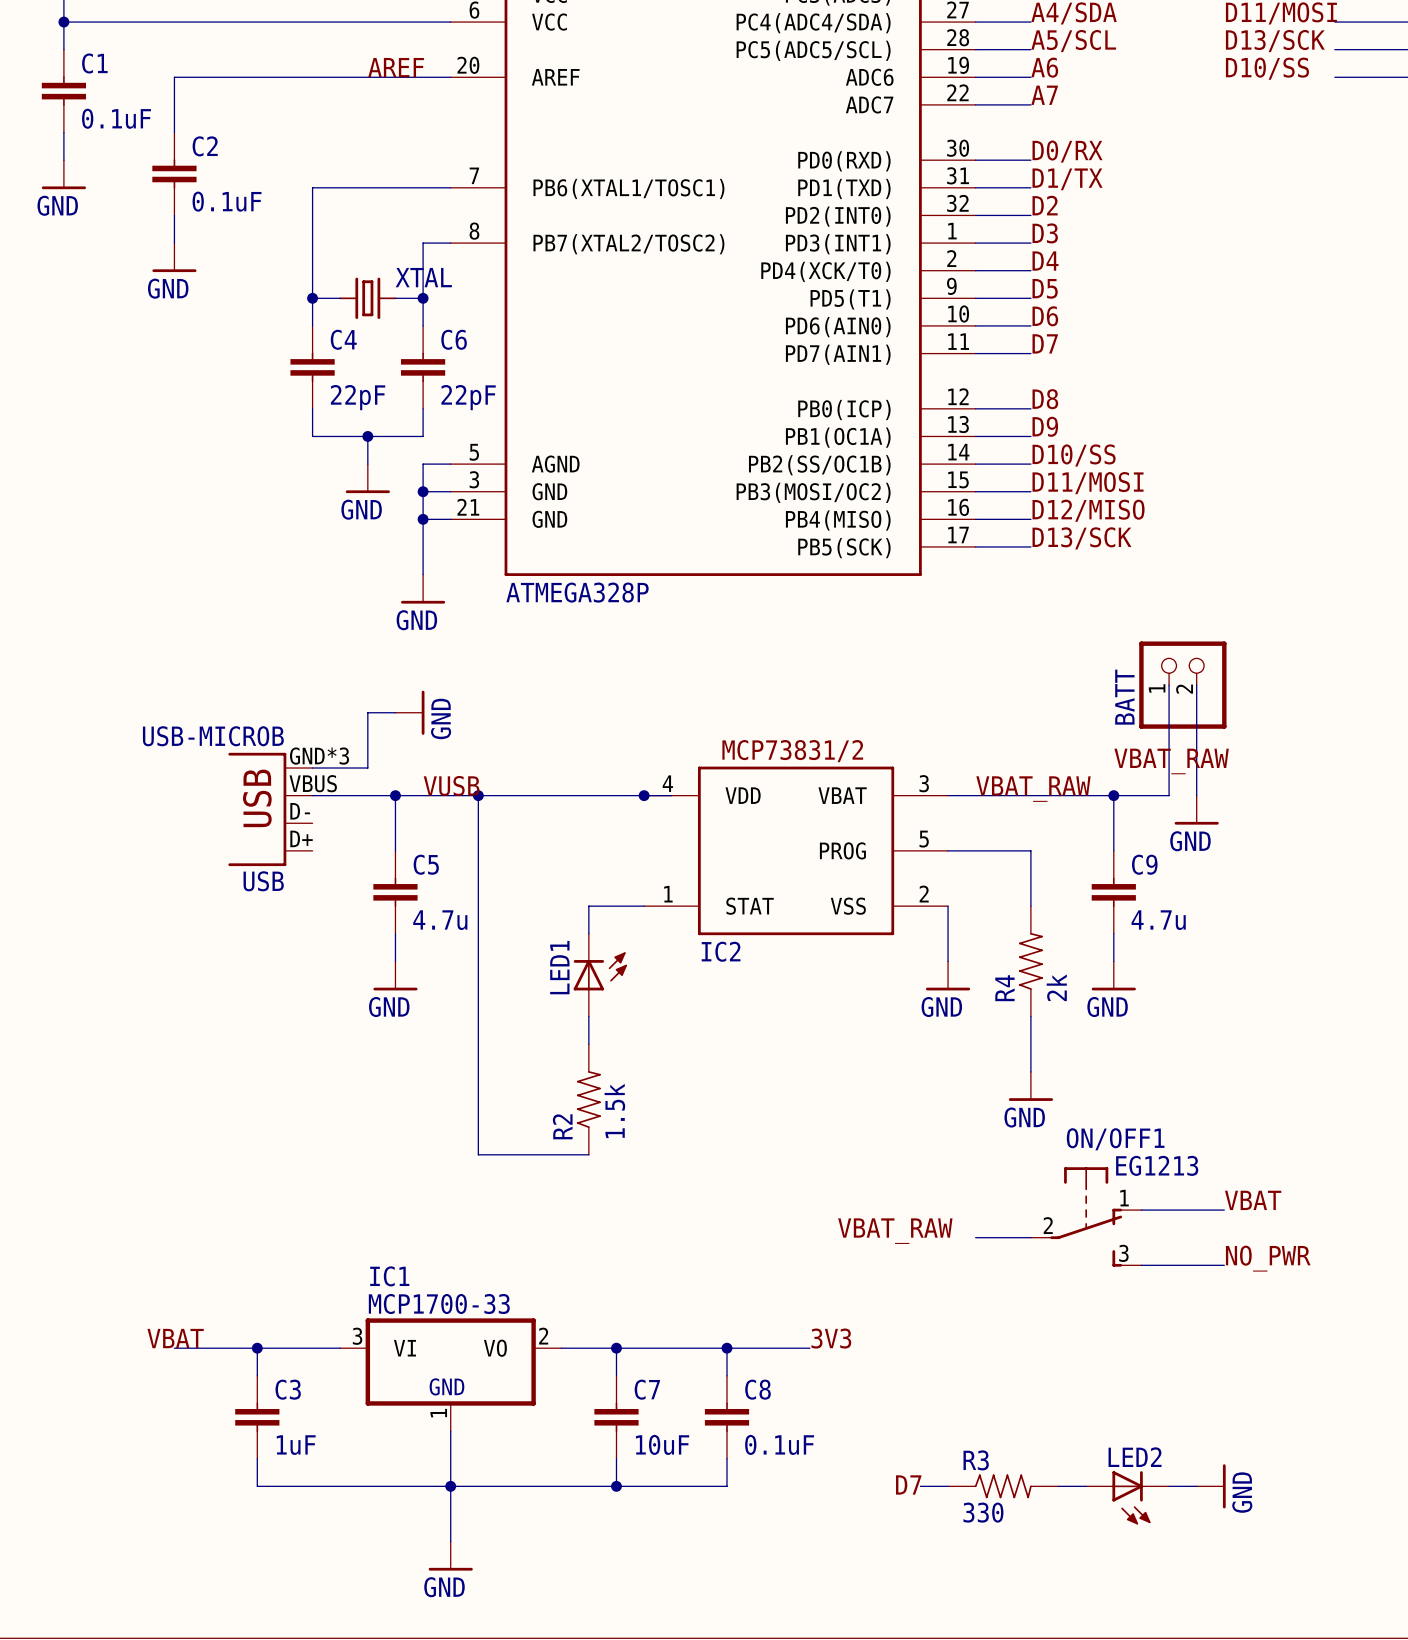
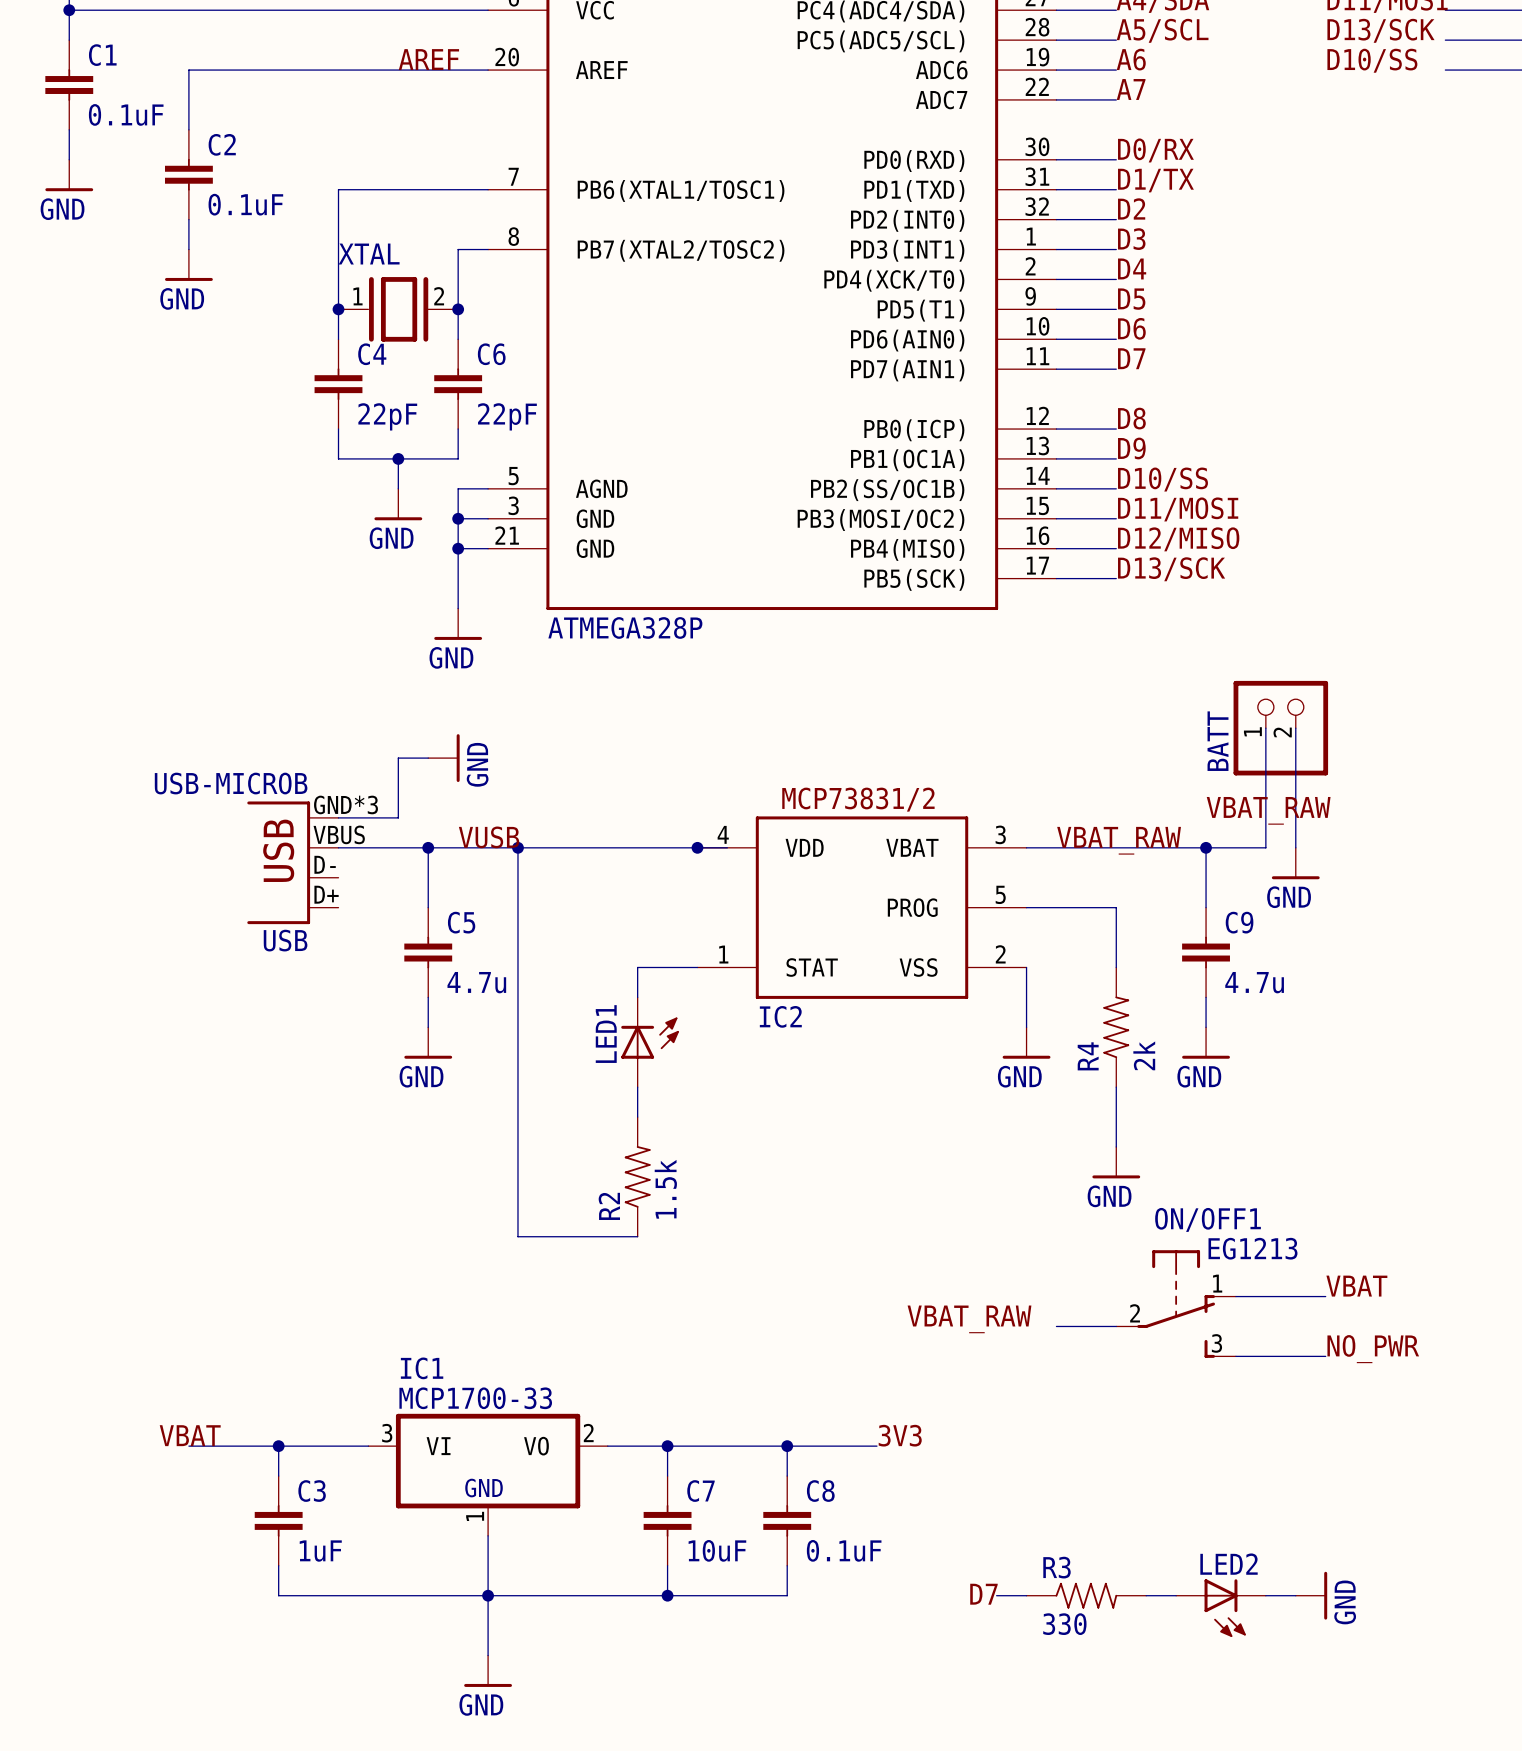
XTAL symbol: [339, 277, 397, 320] -> [338, 277, 459, 342]
XTAL name position: XTAL (423, 277) -> XTAL (369, 254)

